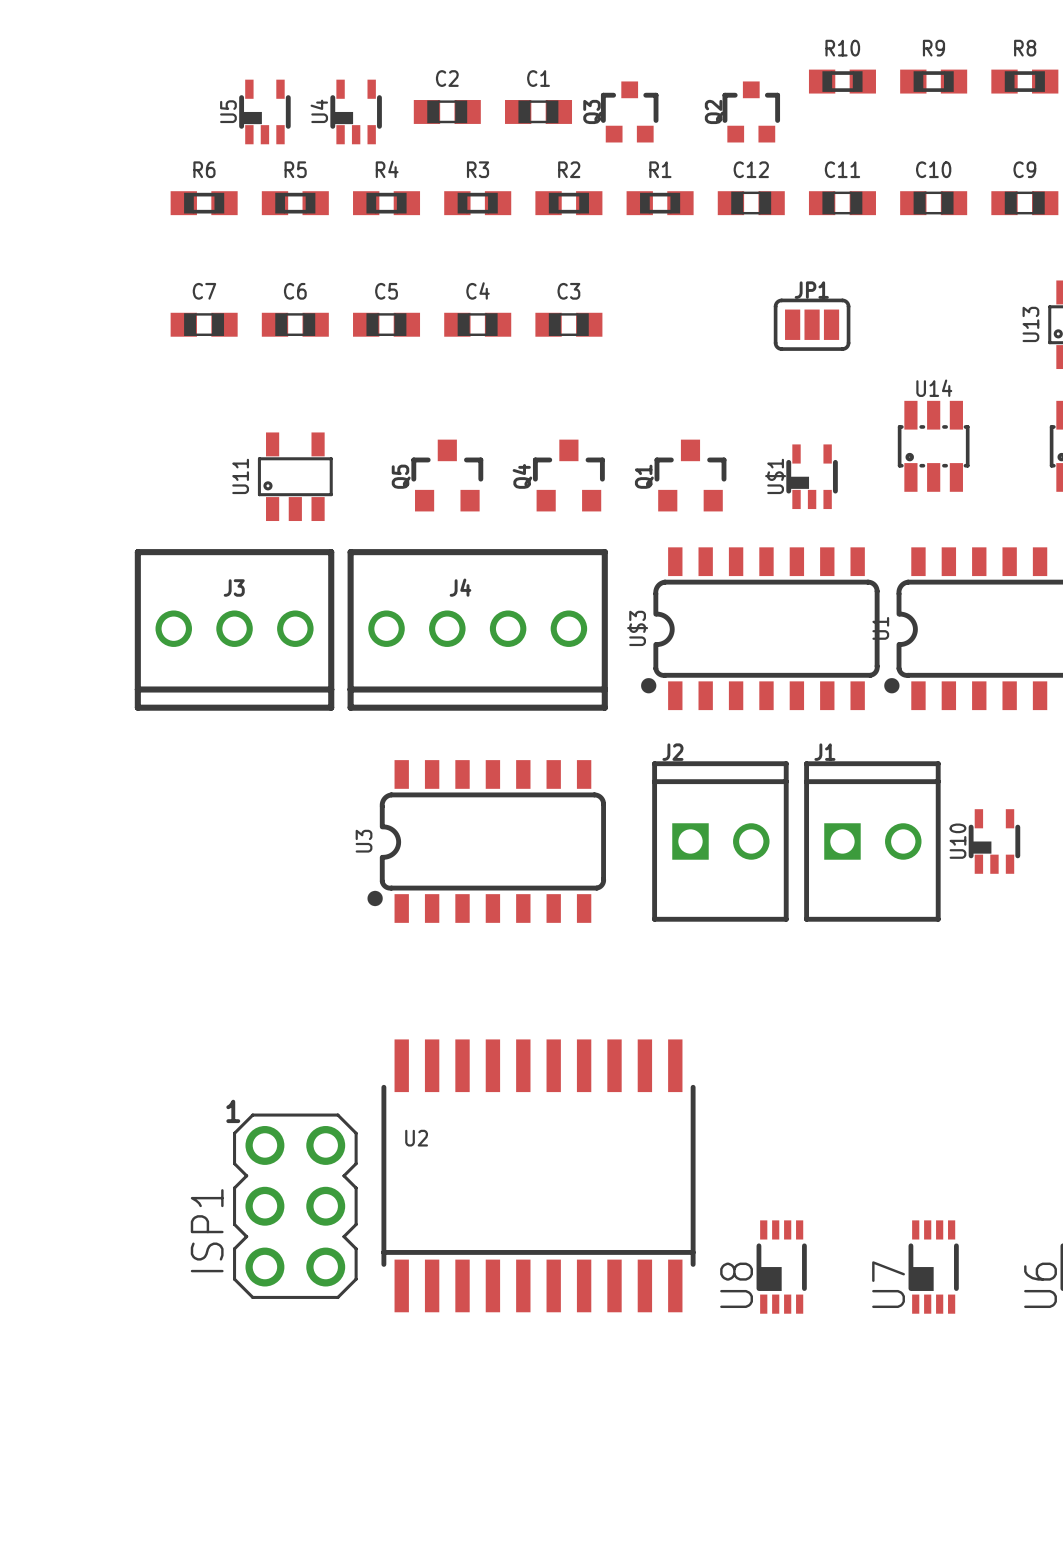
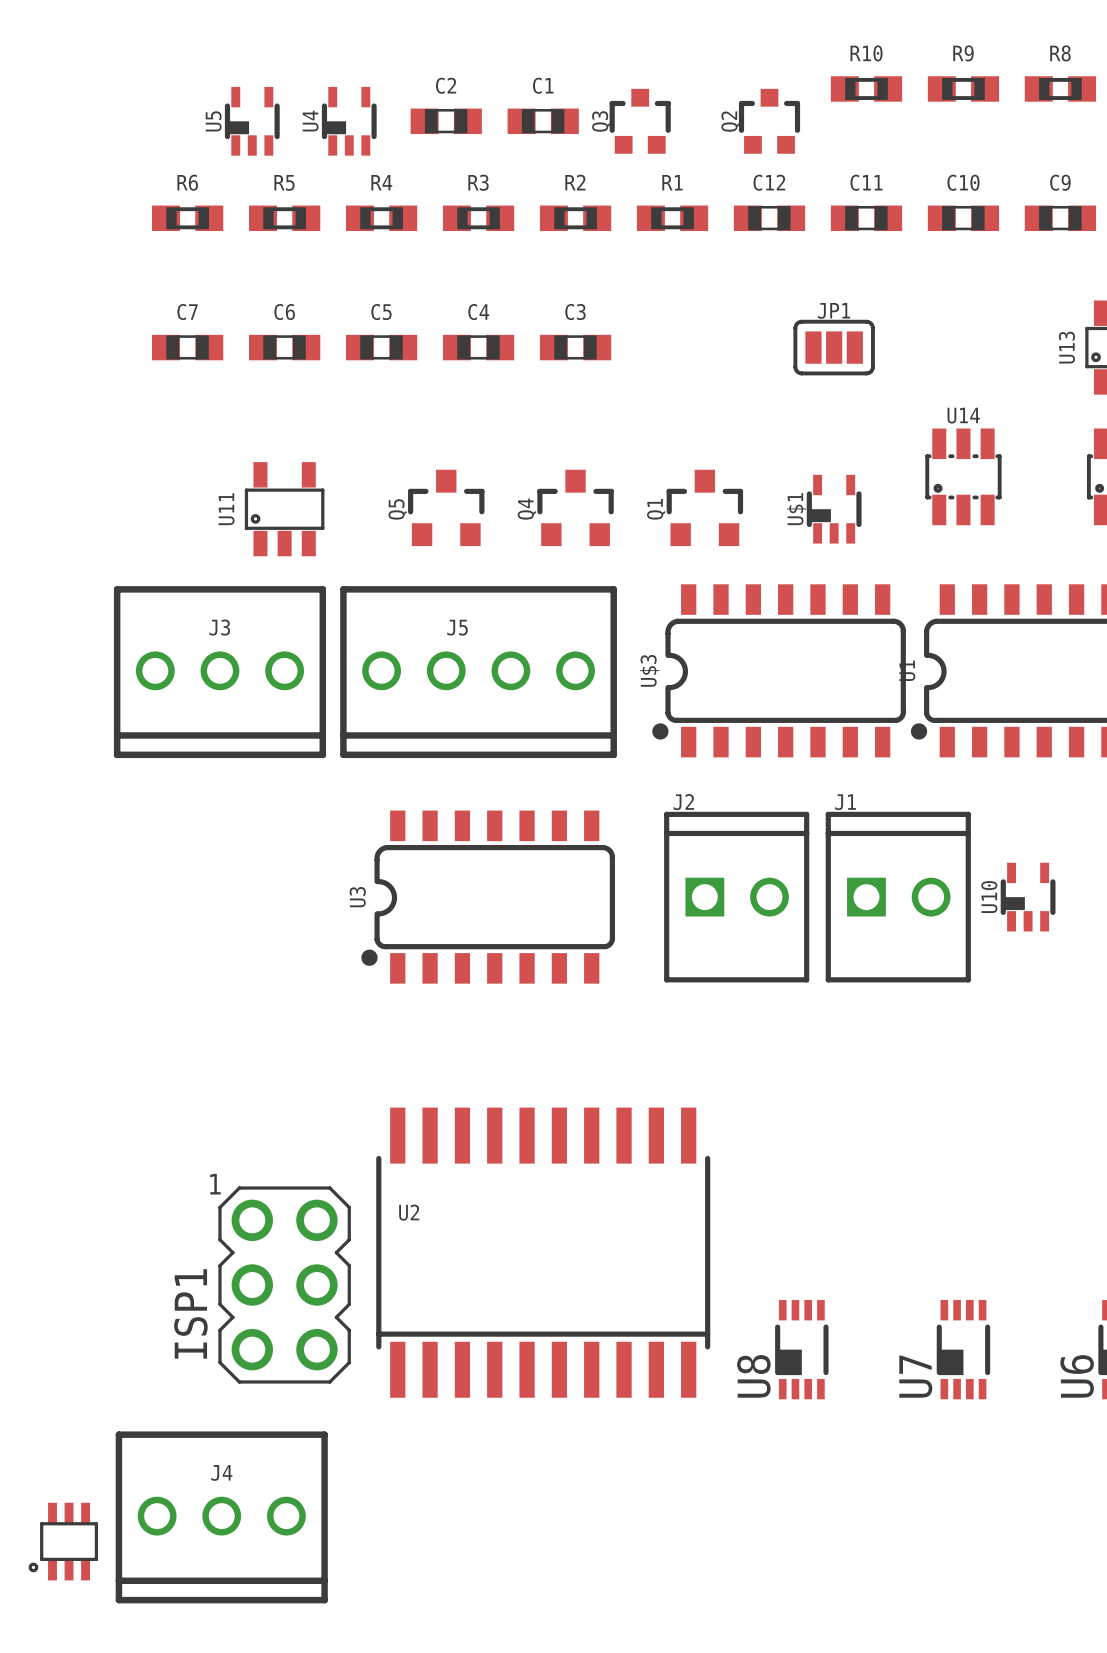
J4 name: J4 (460, 587) -> J5 (457, 627)
J4: none -> (221, 1517)
part: none -> (63, 1541)

